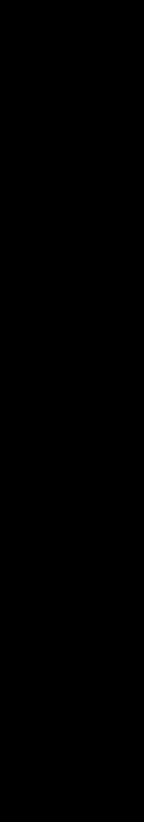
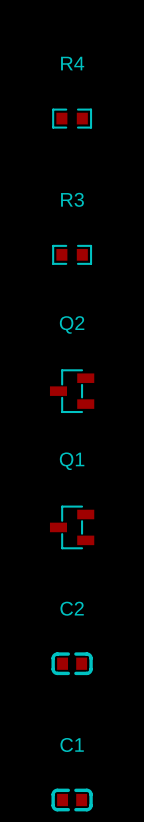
R4: none -> (72, 118)
R3: none -> (72, 254)
Q2: none -> (72, 391)
Q1: none -> (72, 527)
C2: none -> (72, 663)
C1: none -> (72, 800)

